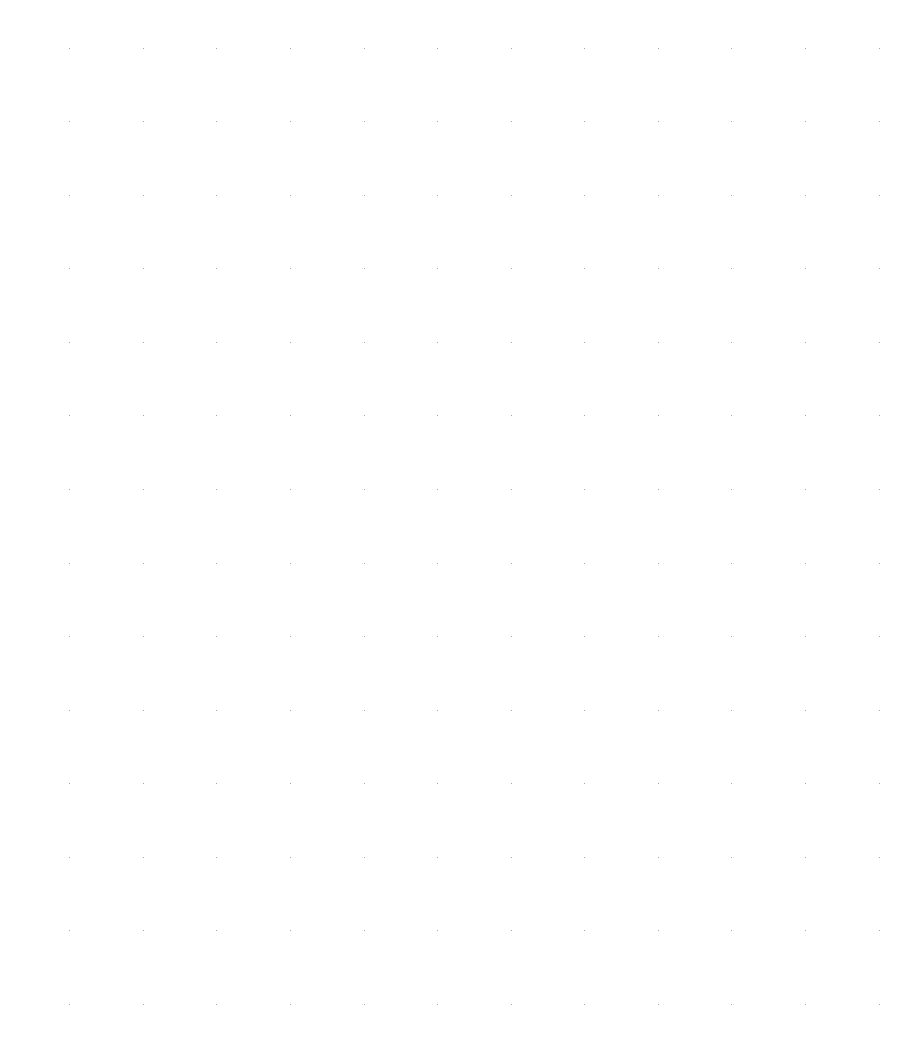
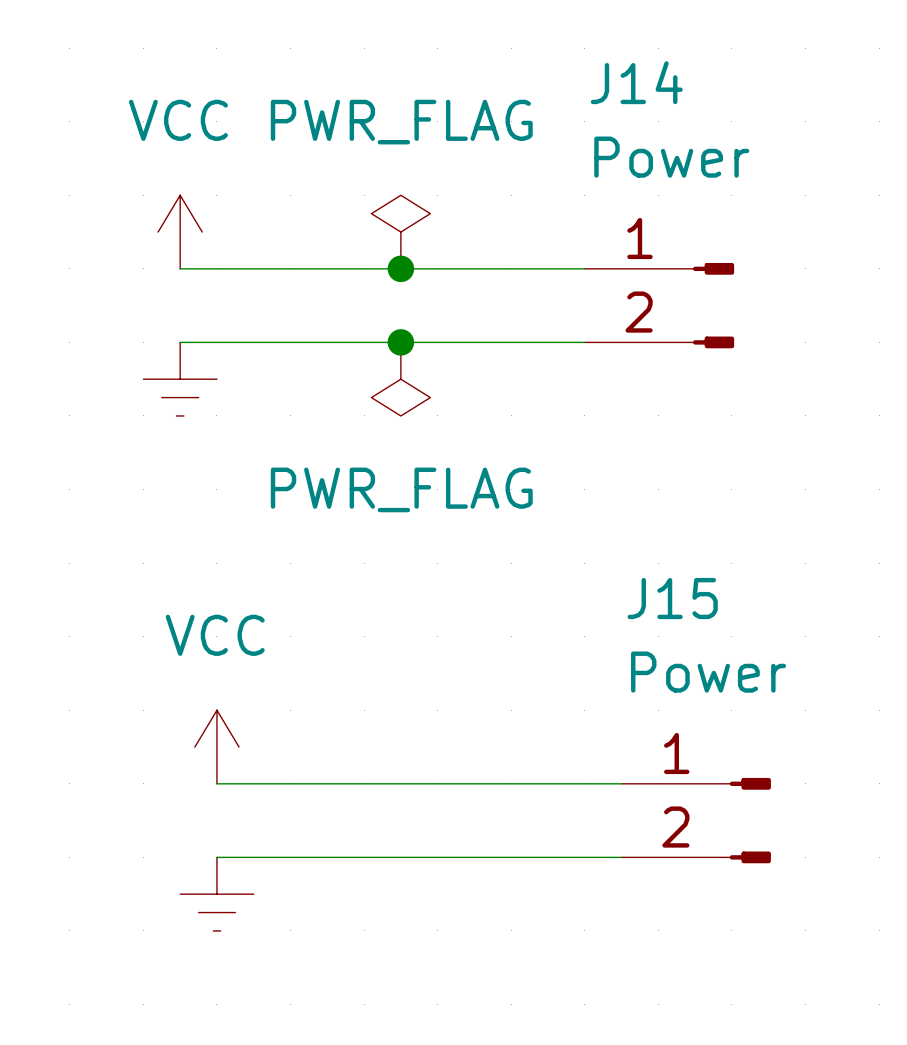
power symbol: none -> VCC (180, 232)
power symbol: none -> PWR_FLAG (400, 232)
wire: none -> (180, 268) (584, 268)
junction: none -> (400, 268)
J14: none -> Power (659, 305)
wire: none -> (180, 342) (584, 342)
junction: none -> (400, 342)
power symbol: none -> (180, 379)
power symbol: none -> PWR_FLAG (400, 379)
power symbol: none -> VCC (216, 747)
wire: none -> (216, 783) (621, 783)
J15: none -> Power (696, 820)
wire: none -> (216, 857) (621, 857)
power symbol: none -> (216, 894)

